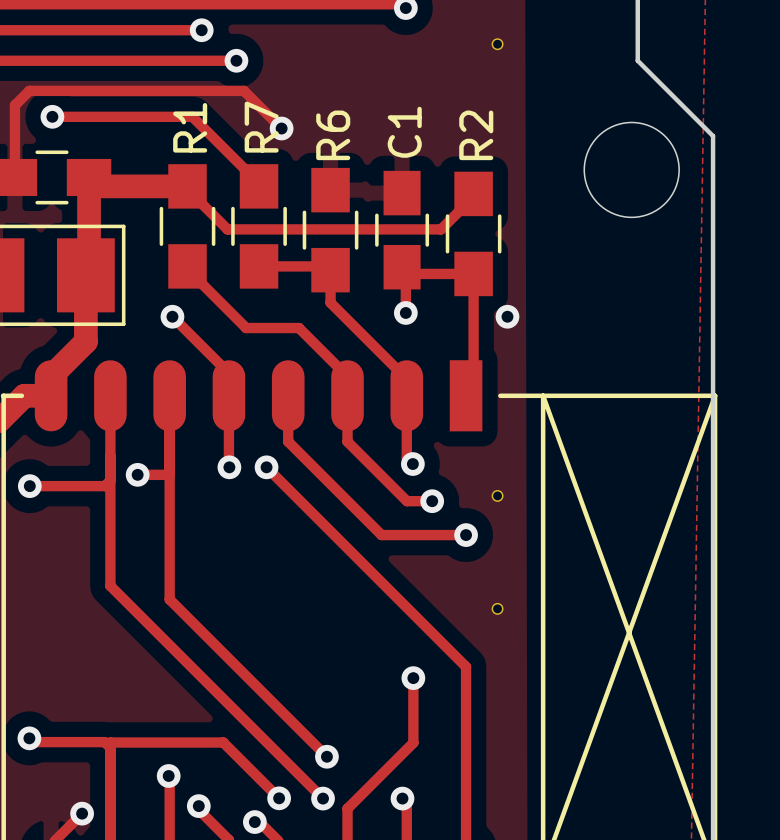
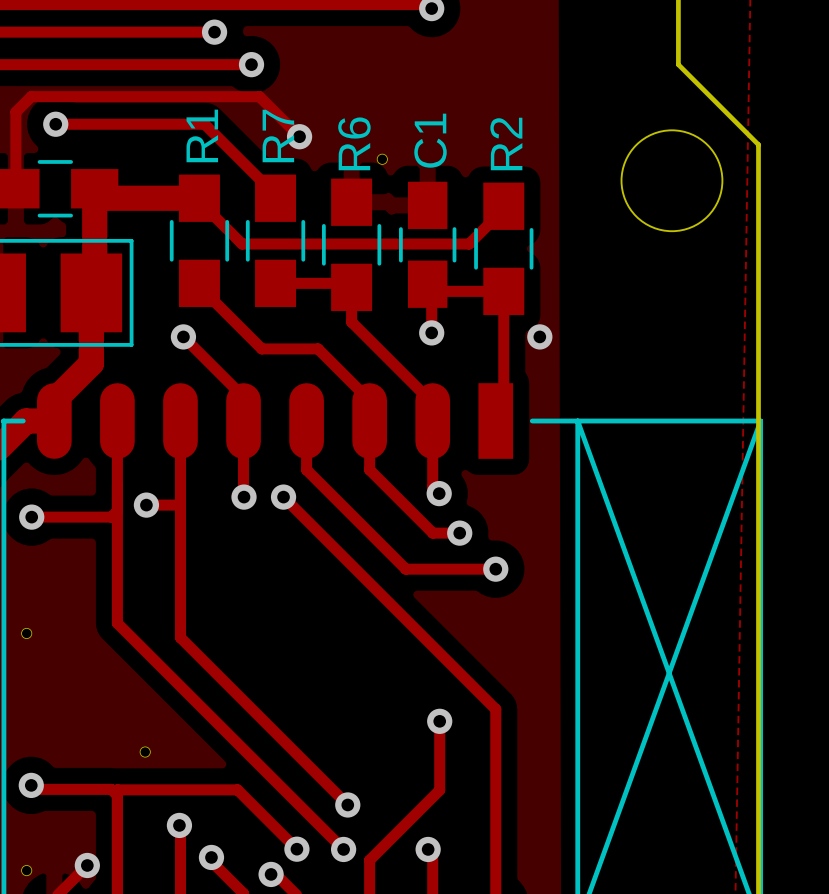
part: (497, 44) -> none
part: none -> (382, 159)
part: (497, 495) -> none
part: none -> (26, 633)
part: (497, 608) -> none
part: none -> (145, 752)
part: none -> (26, 870)

